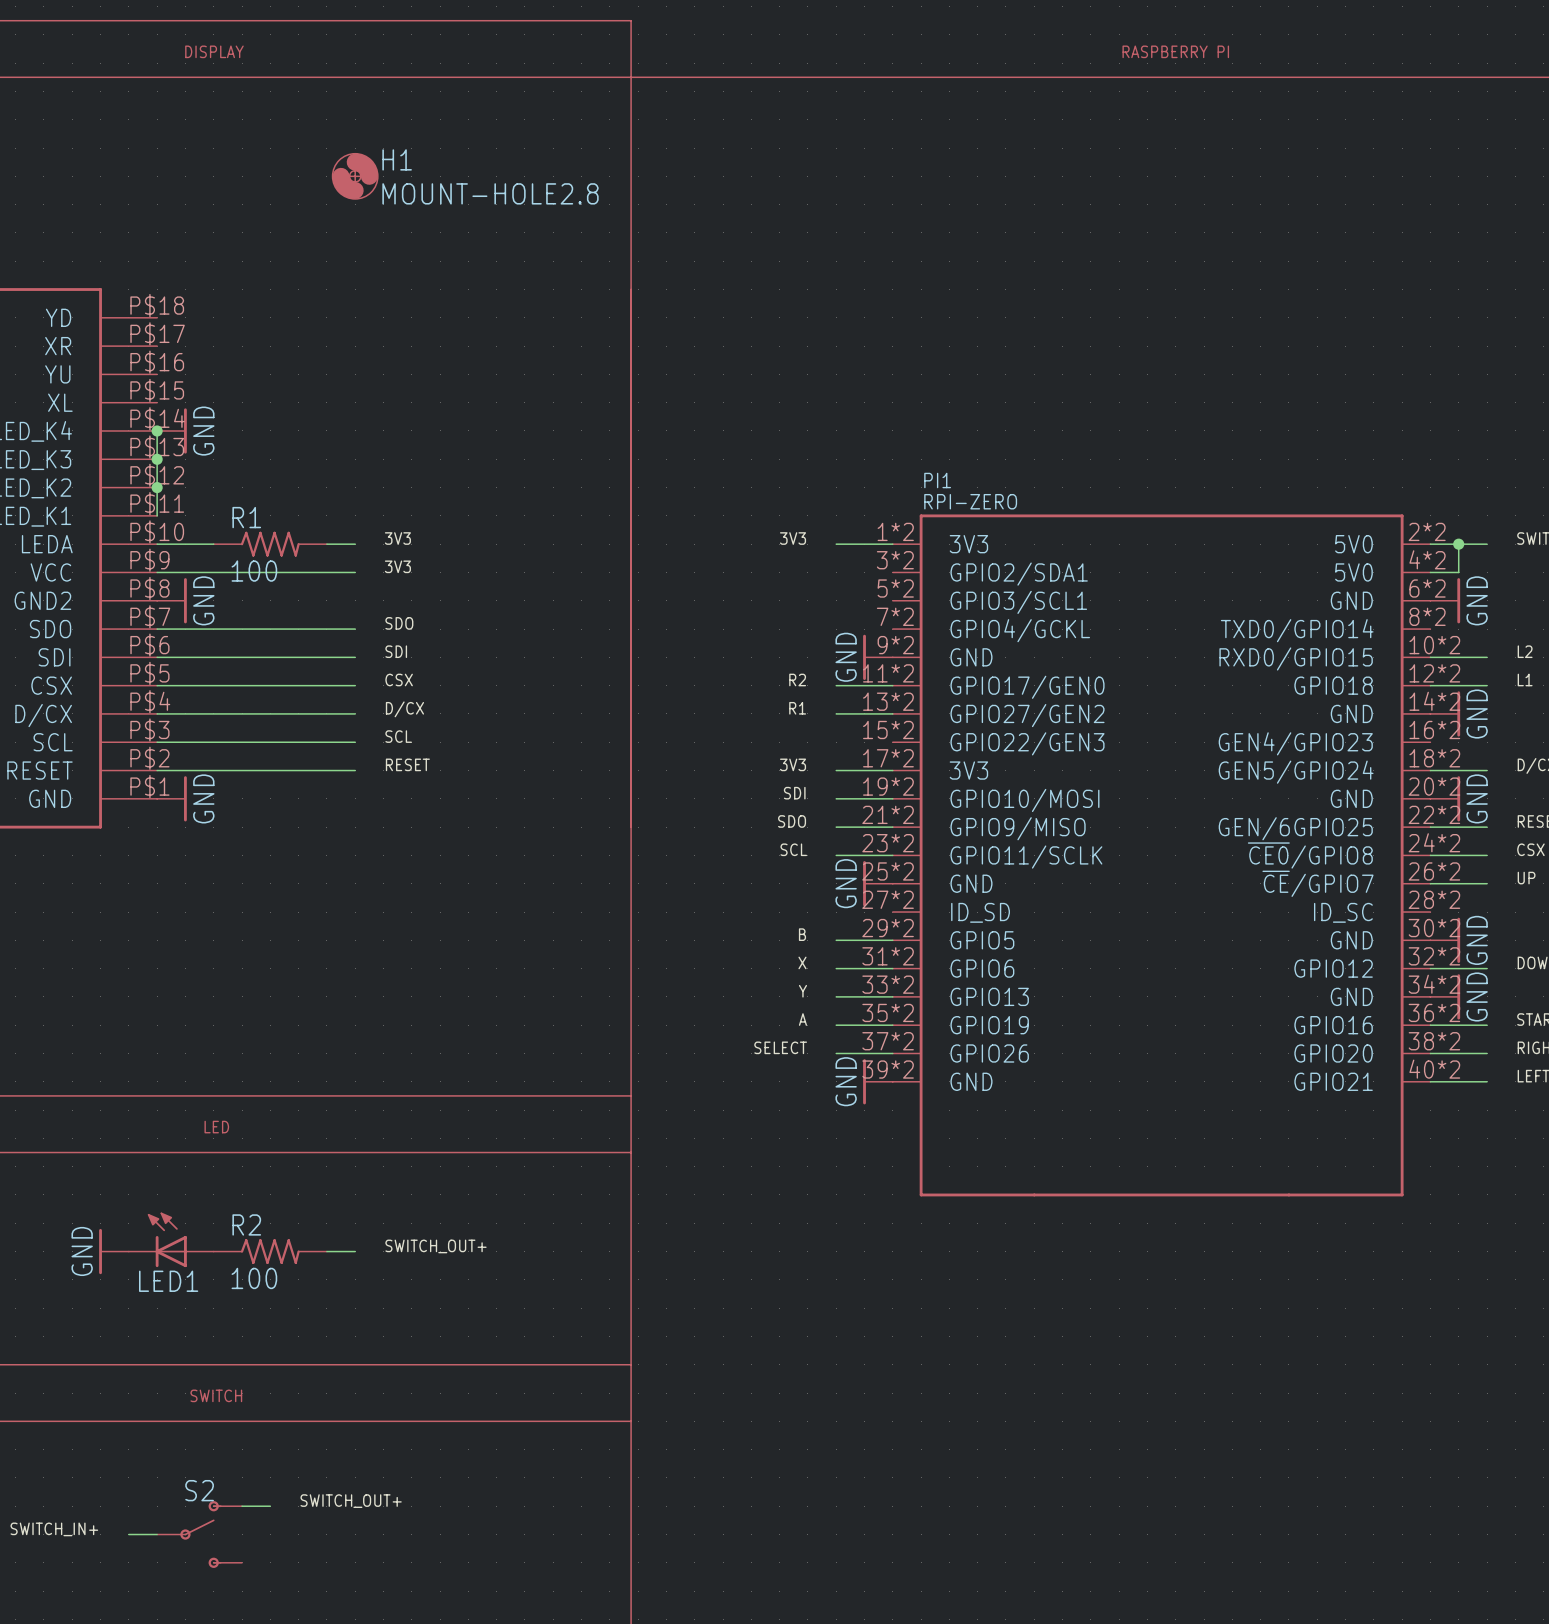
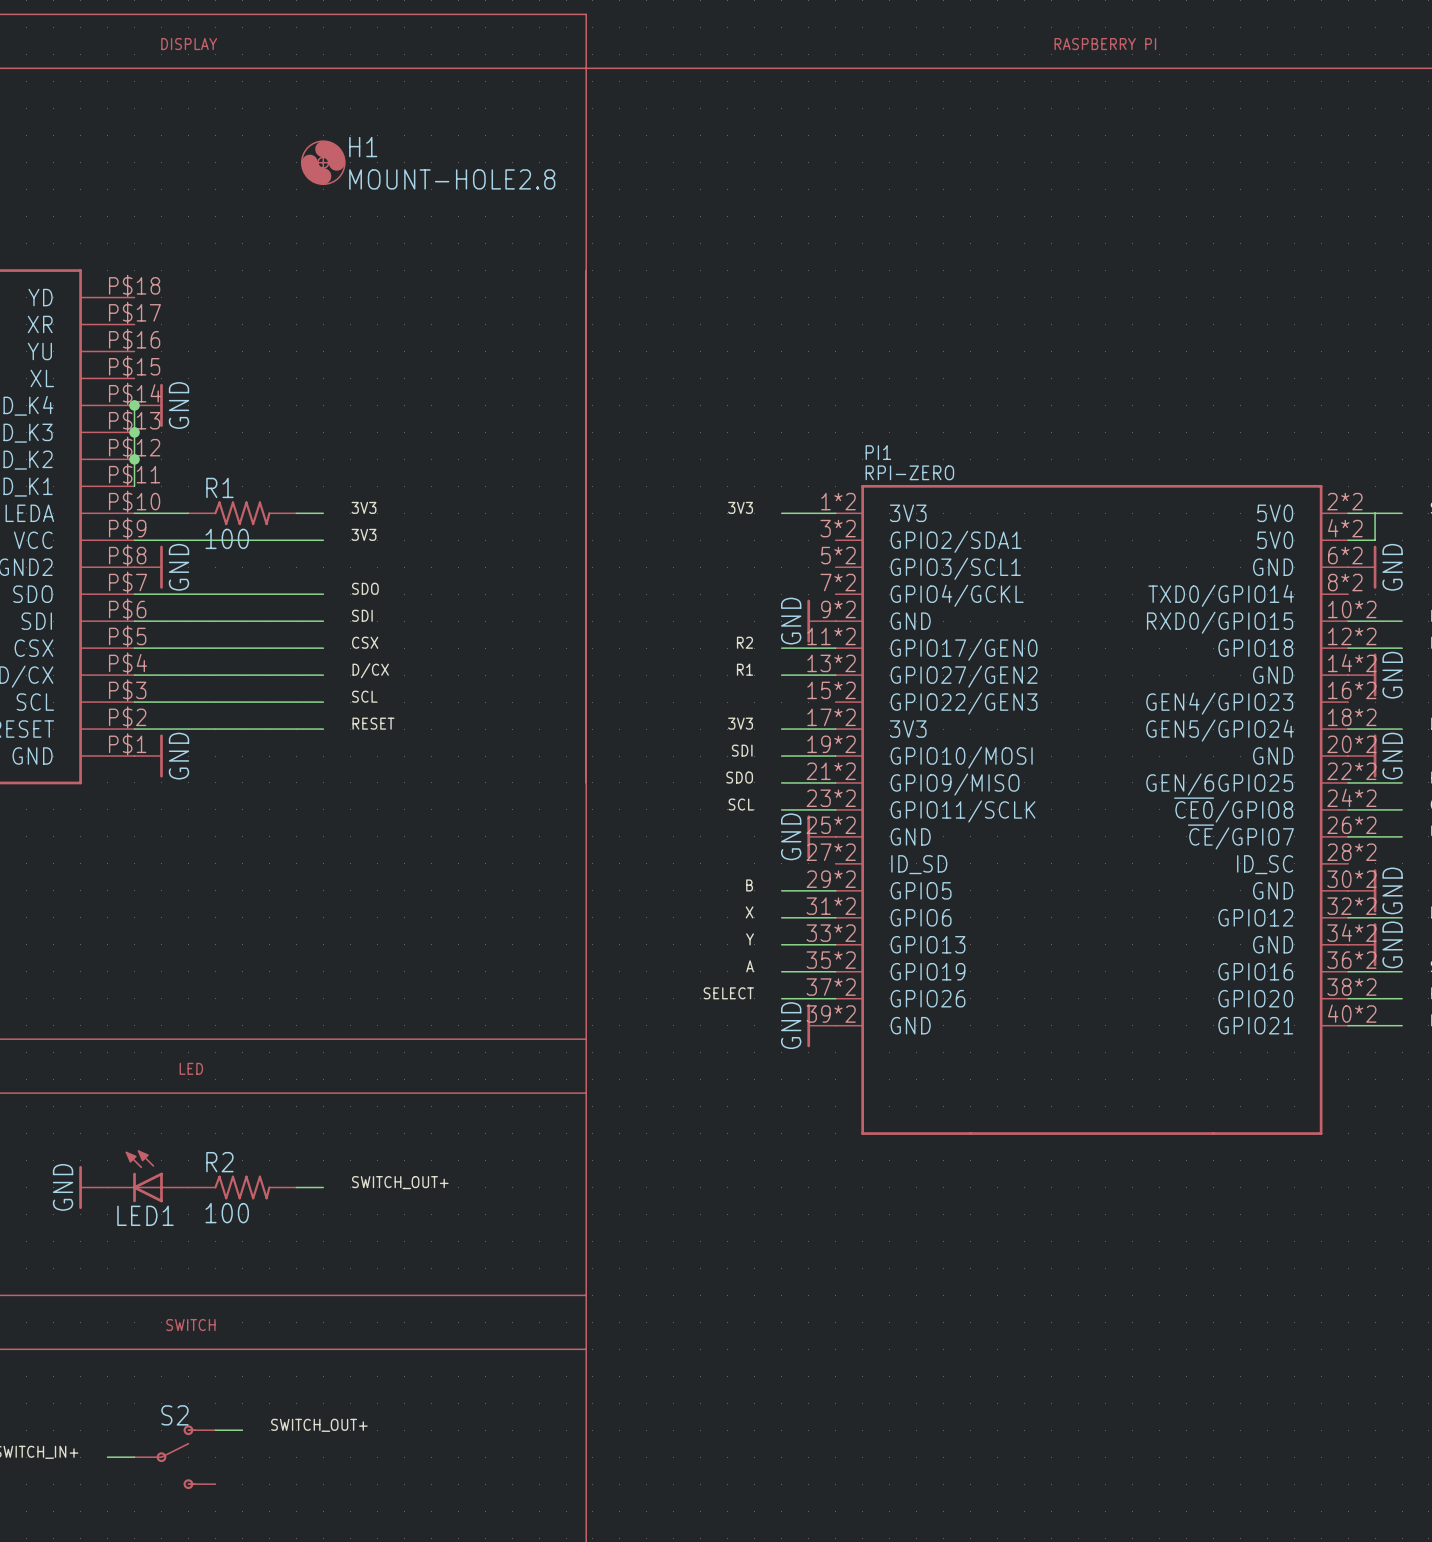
junction: (1458, 544) -> none

